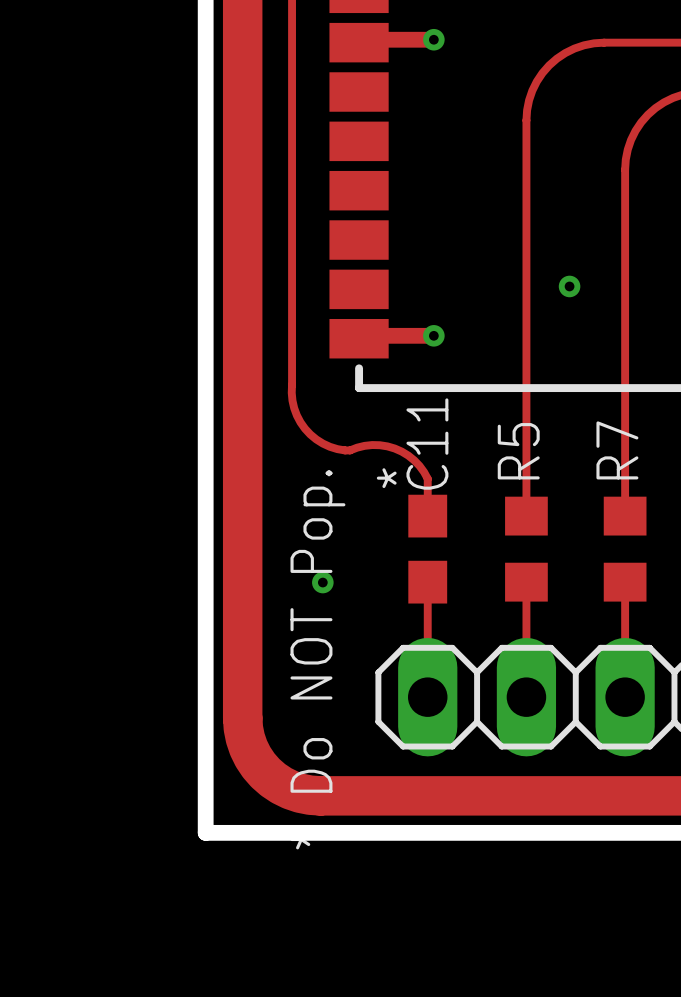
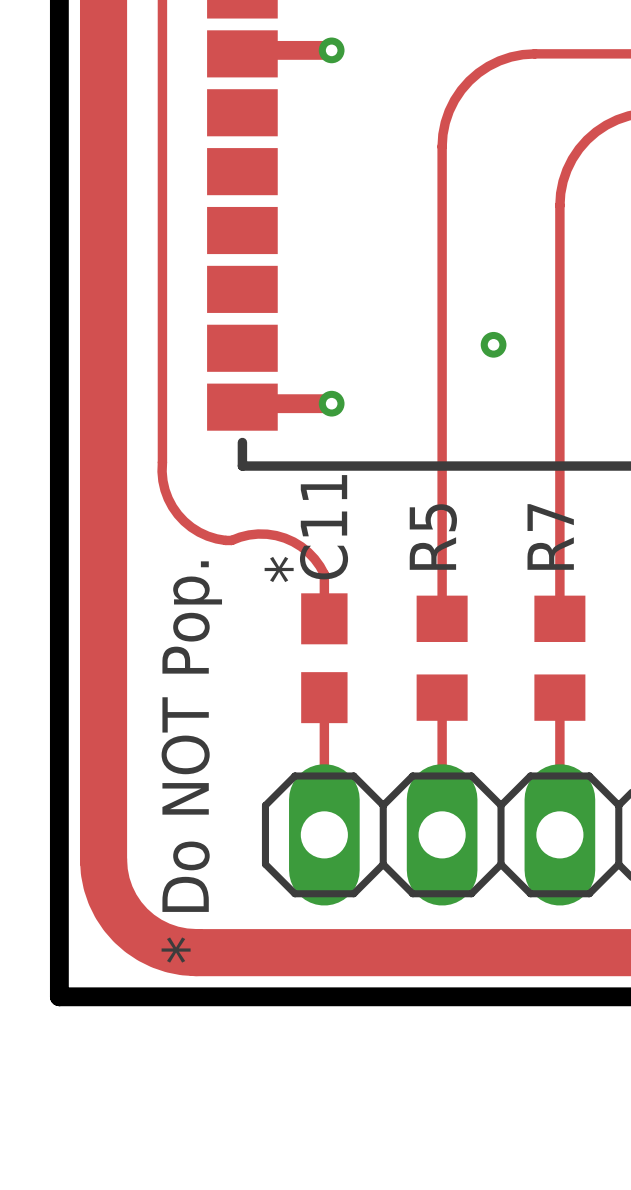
via: (322, 582) -> none

